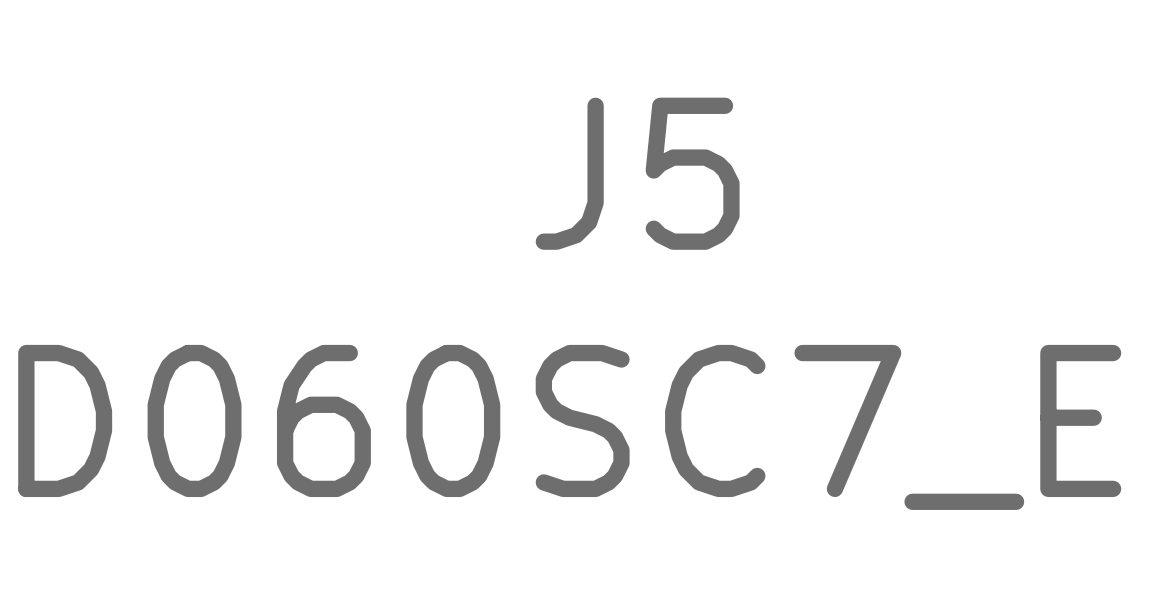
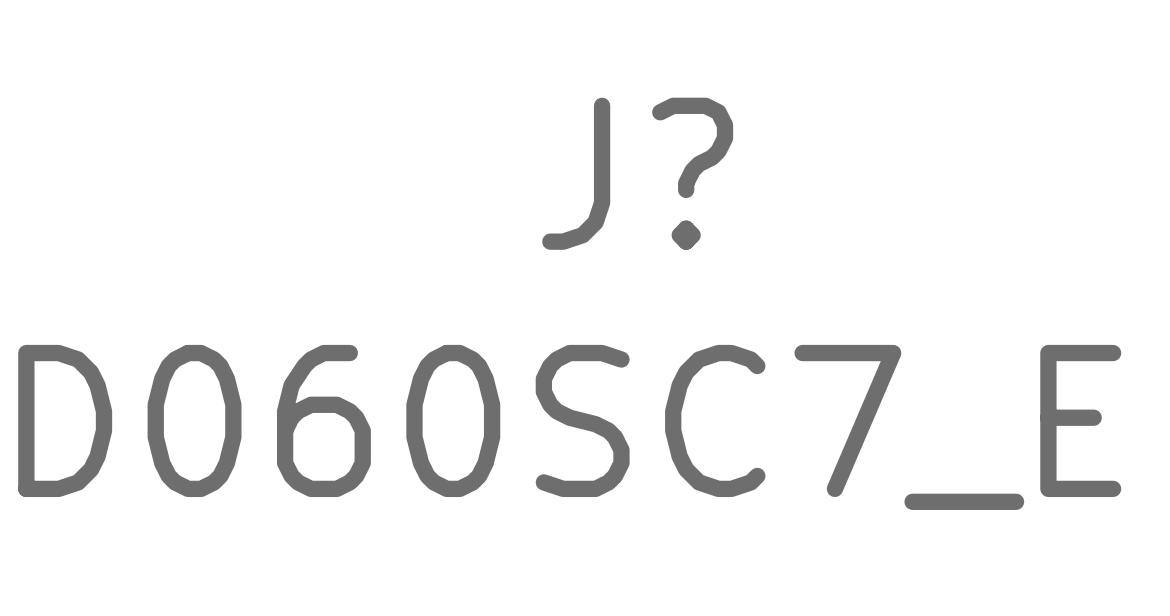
J5 name: J5 (637, 173) -> J? (637, 173)

